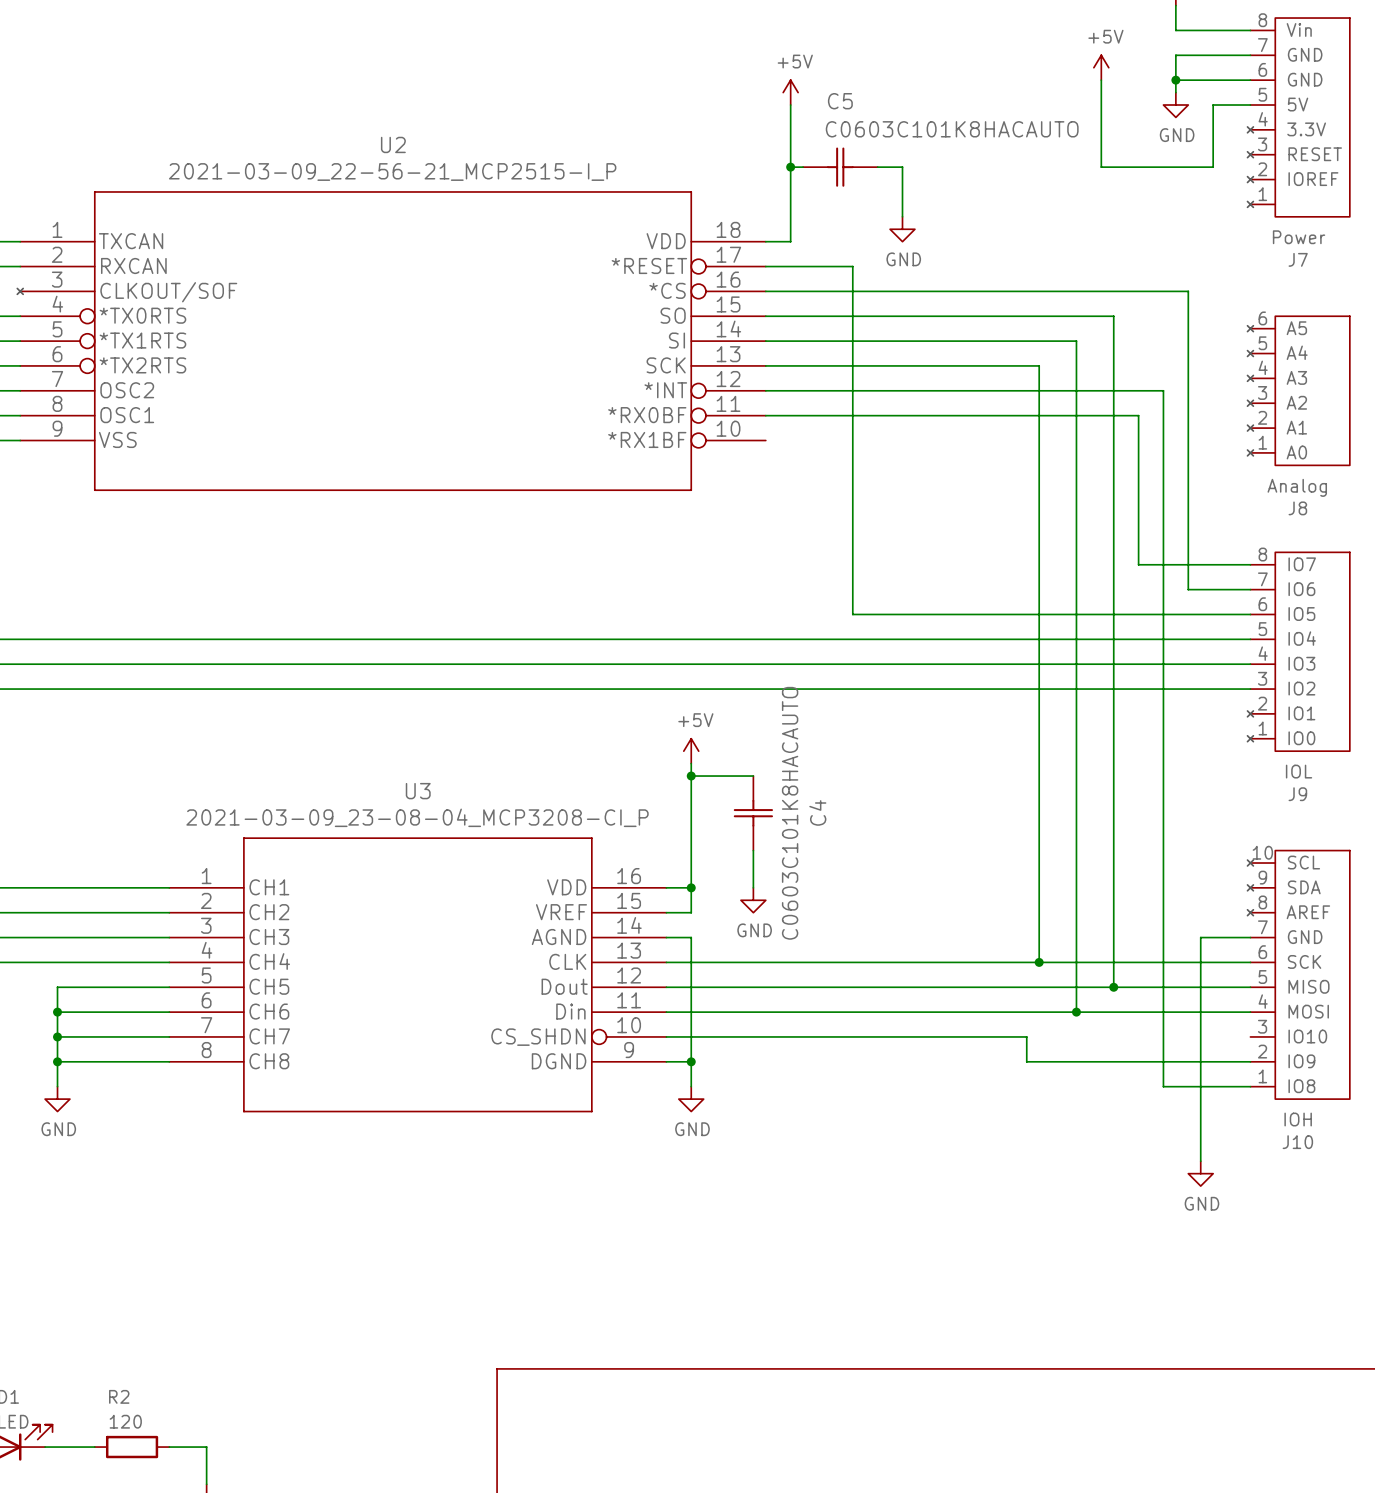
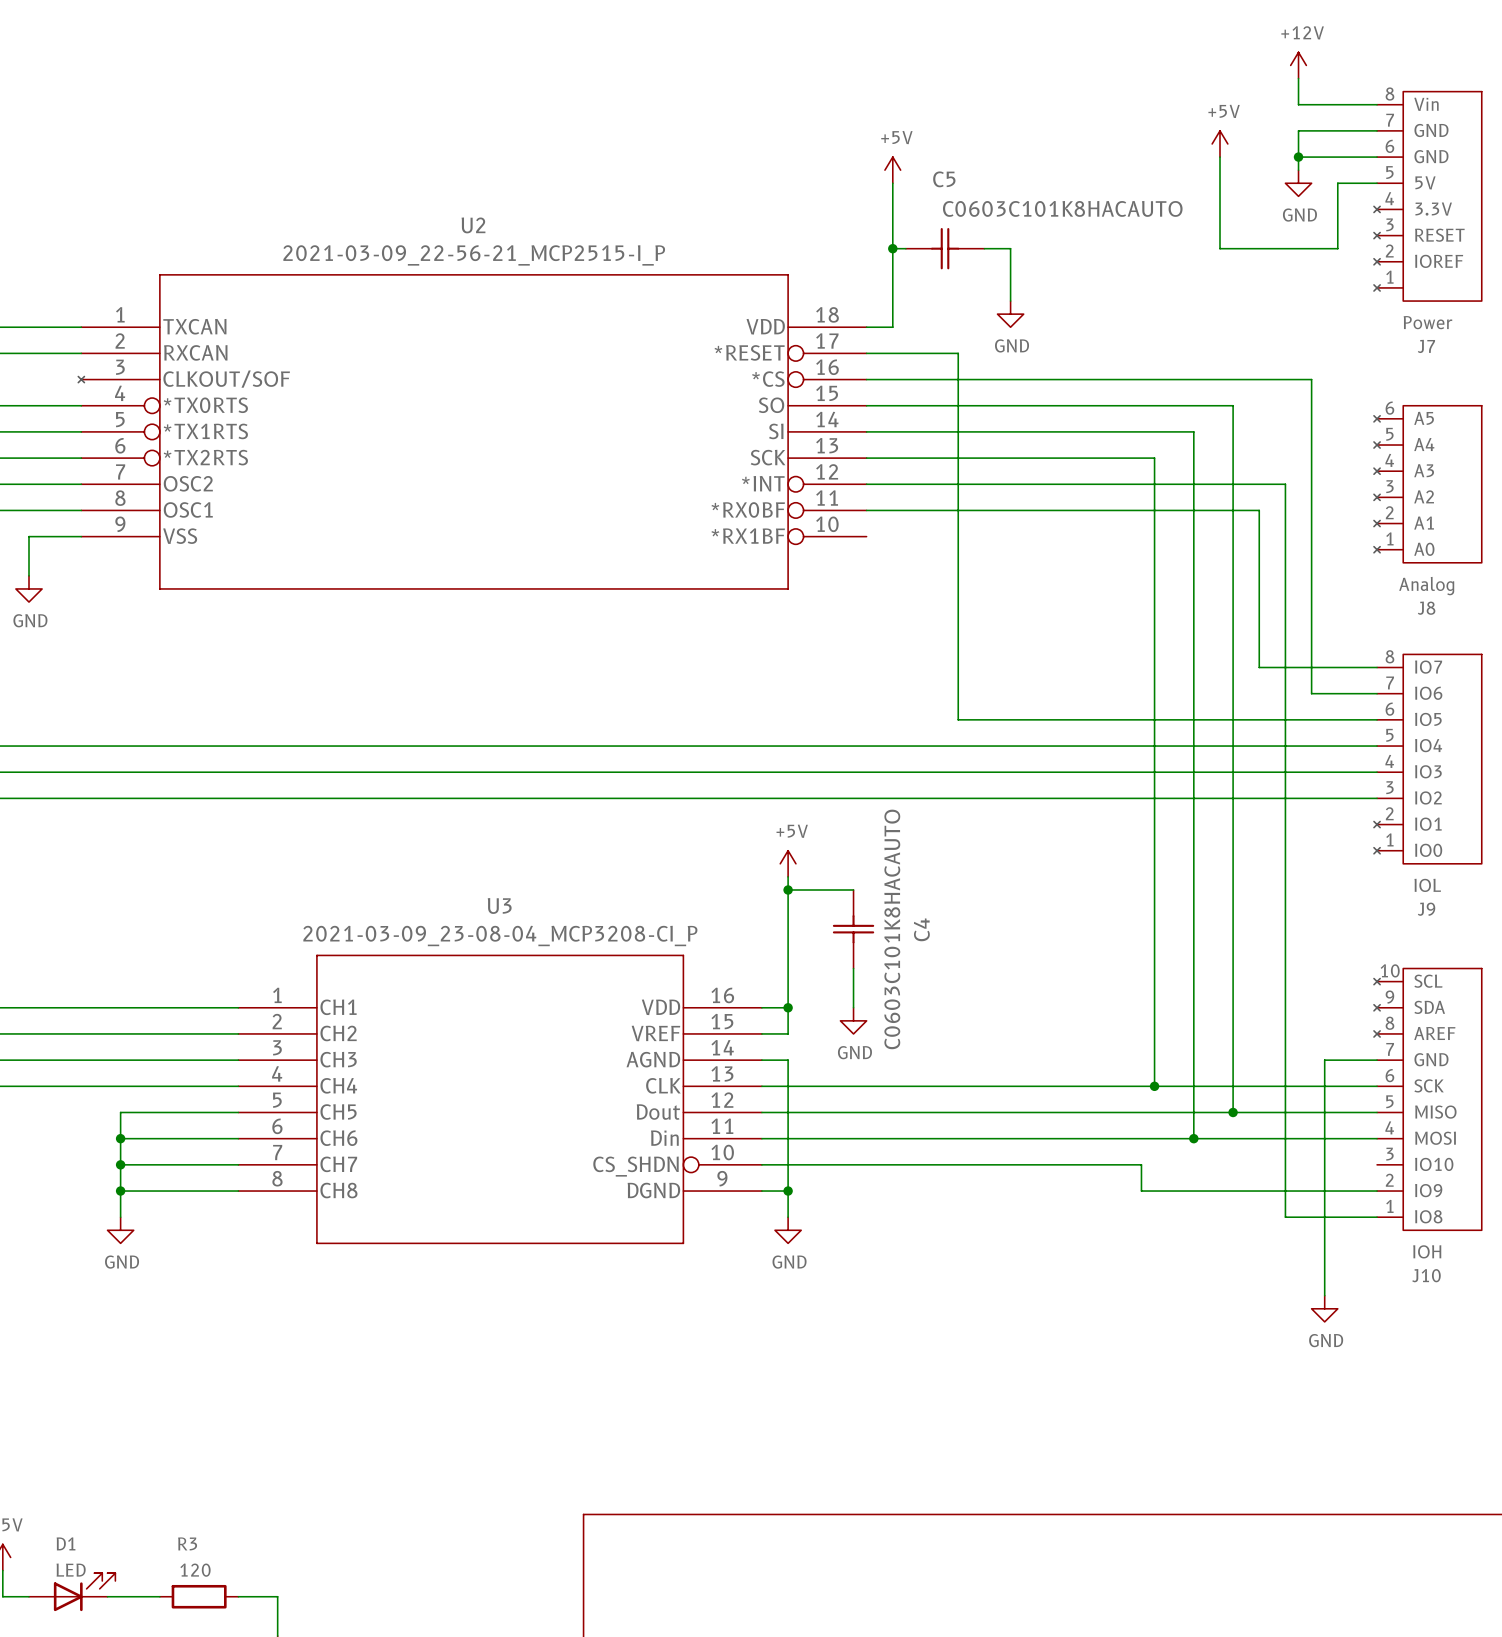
R2 name: R2 (119, 1396) -> R3 (187, 1543)

